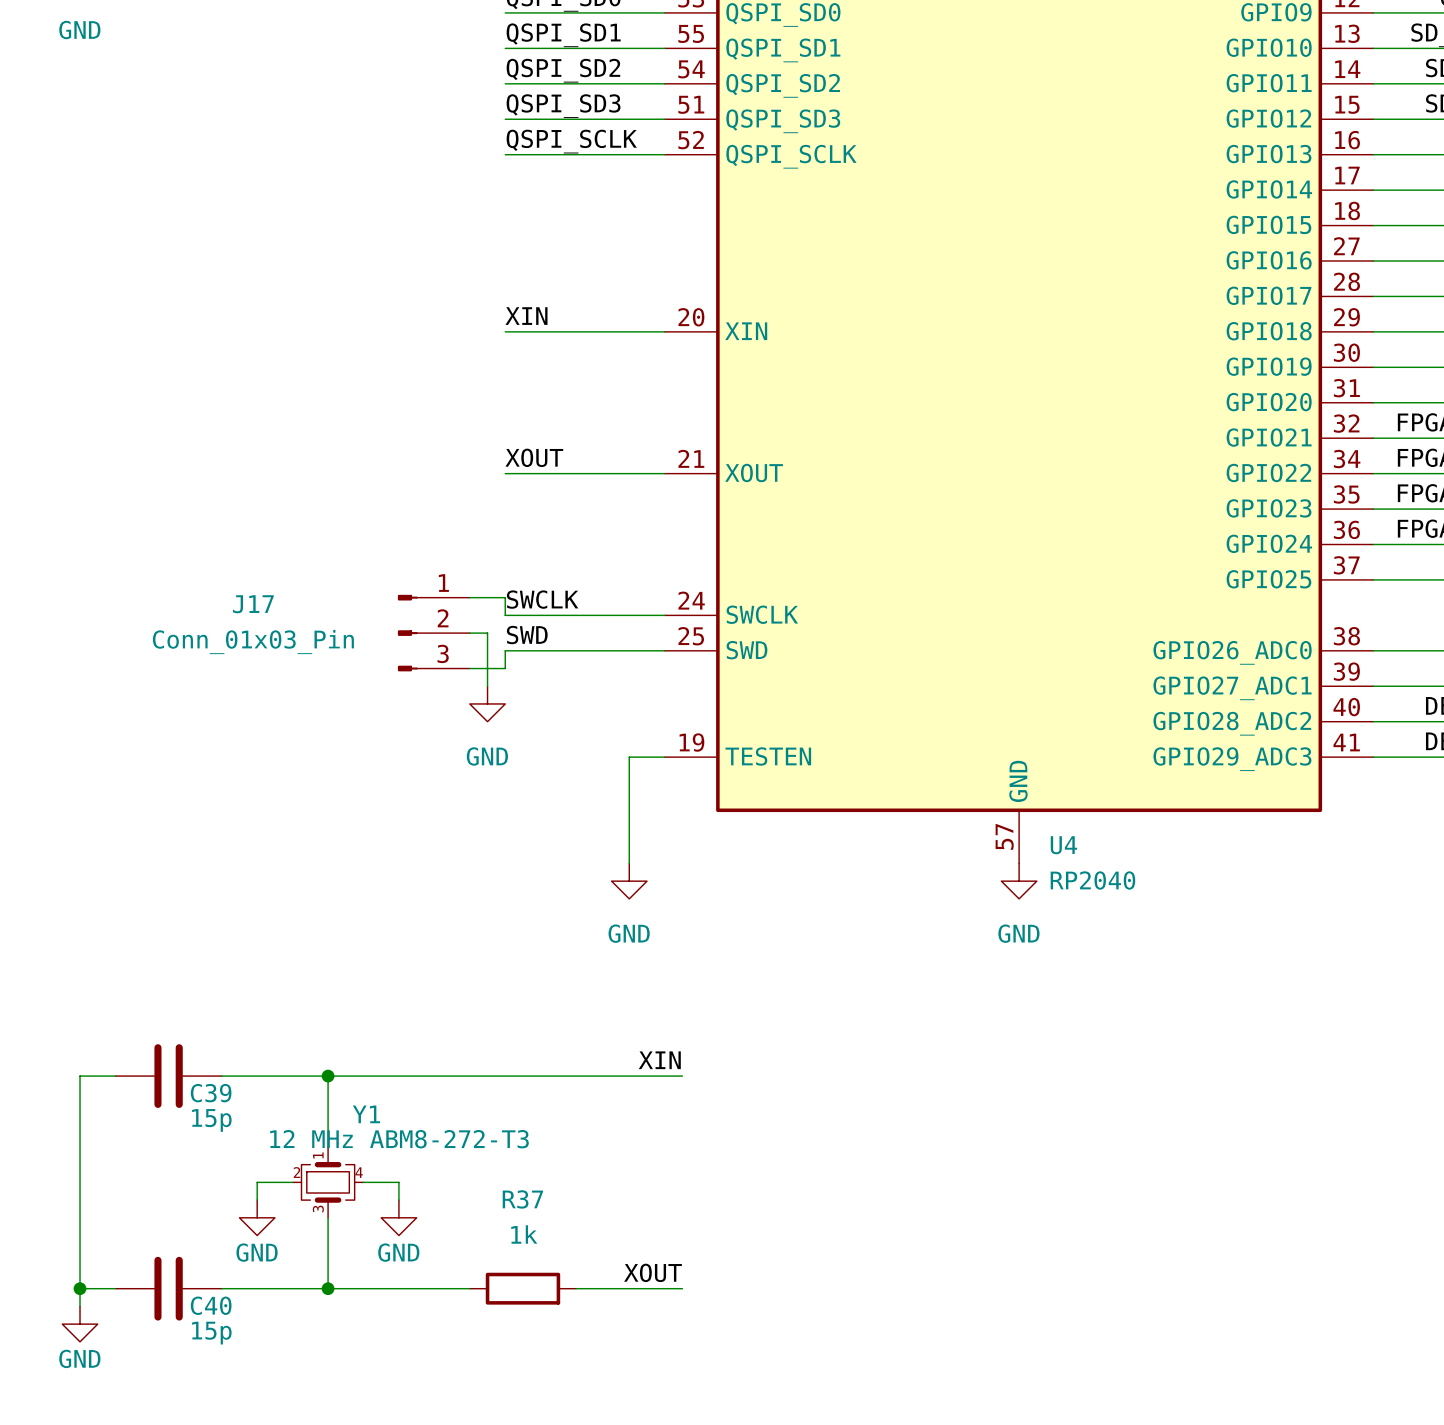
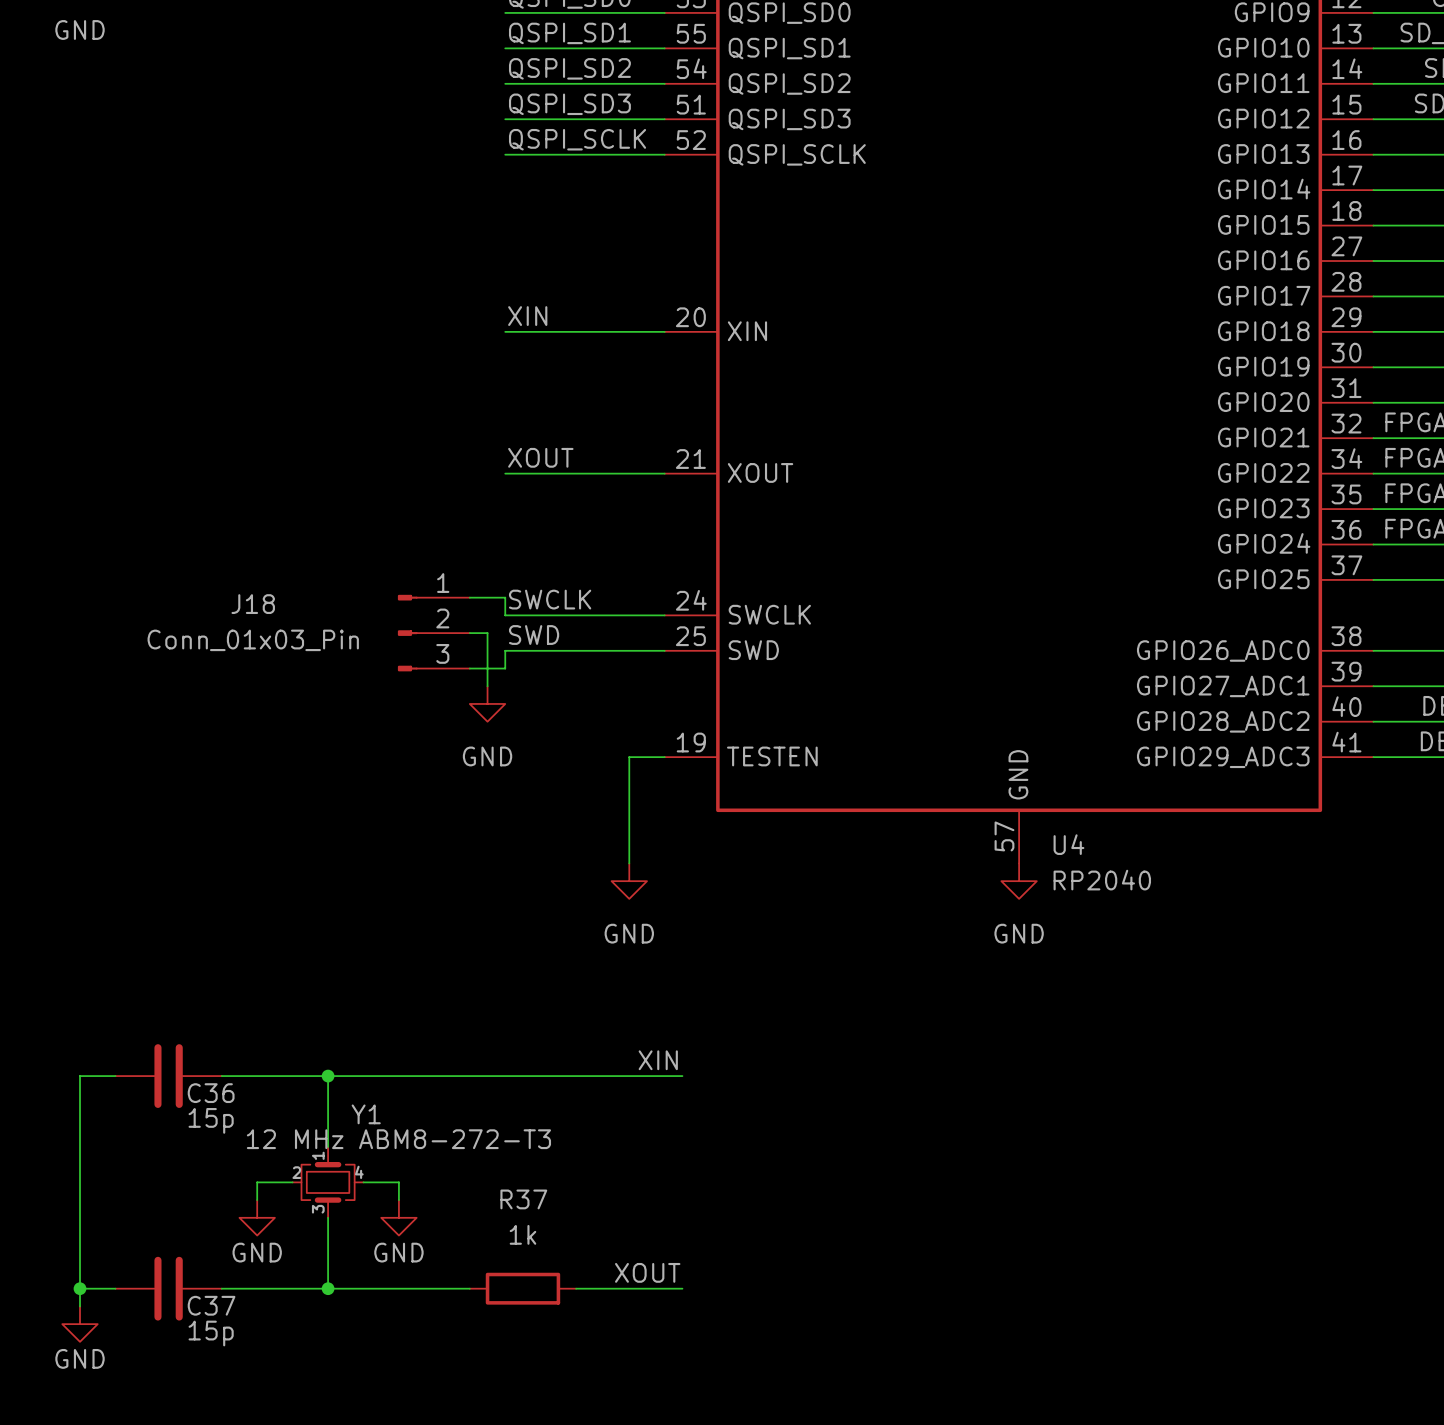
J17 name: J17 (253, 604) -> J18 (253, 604)
C39 name: C39 (211, 1093) -> C36 (211, 1093)
C40 name: C40 (211, 1305) -> C37 (211, 1305)

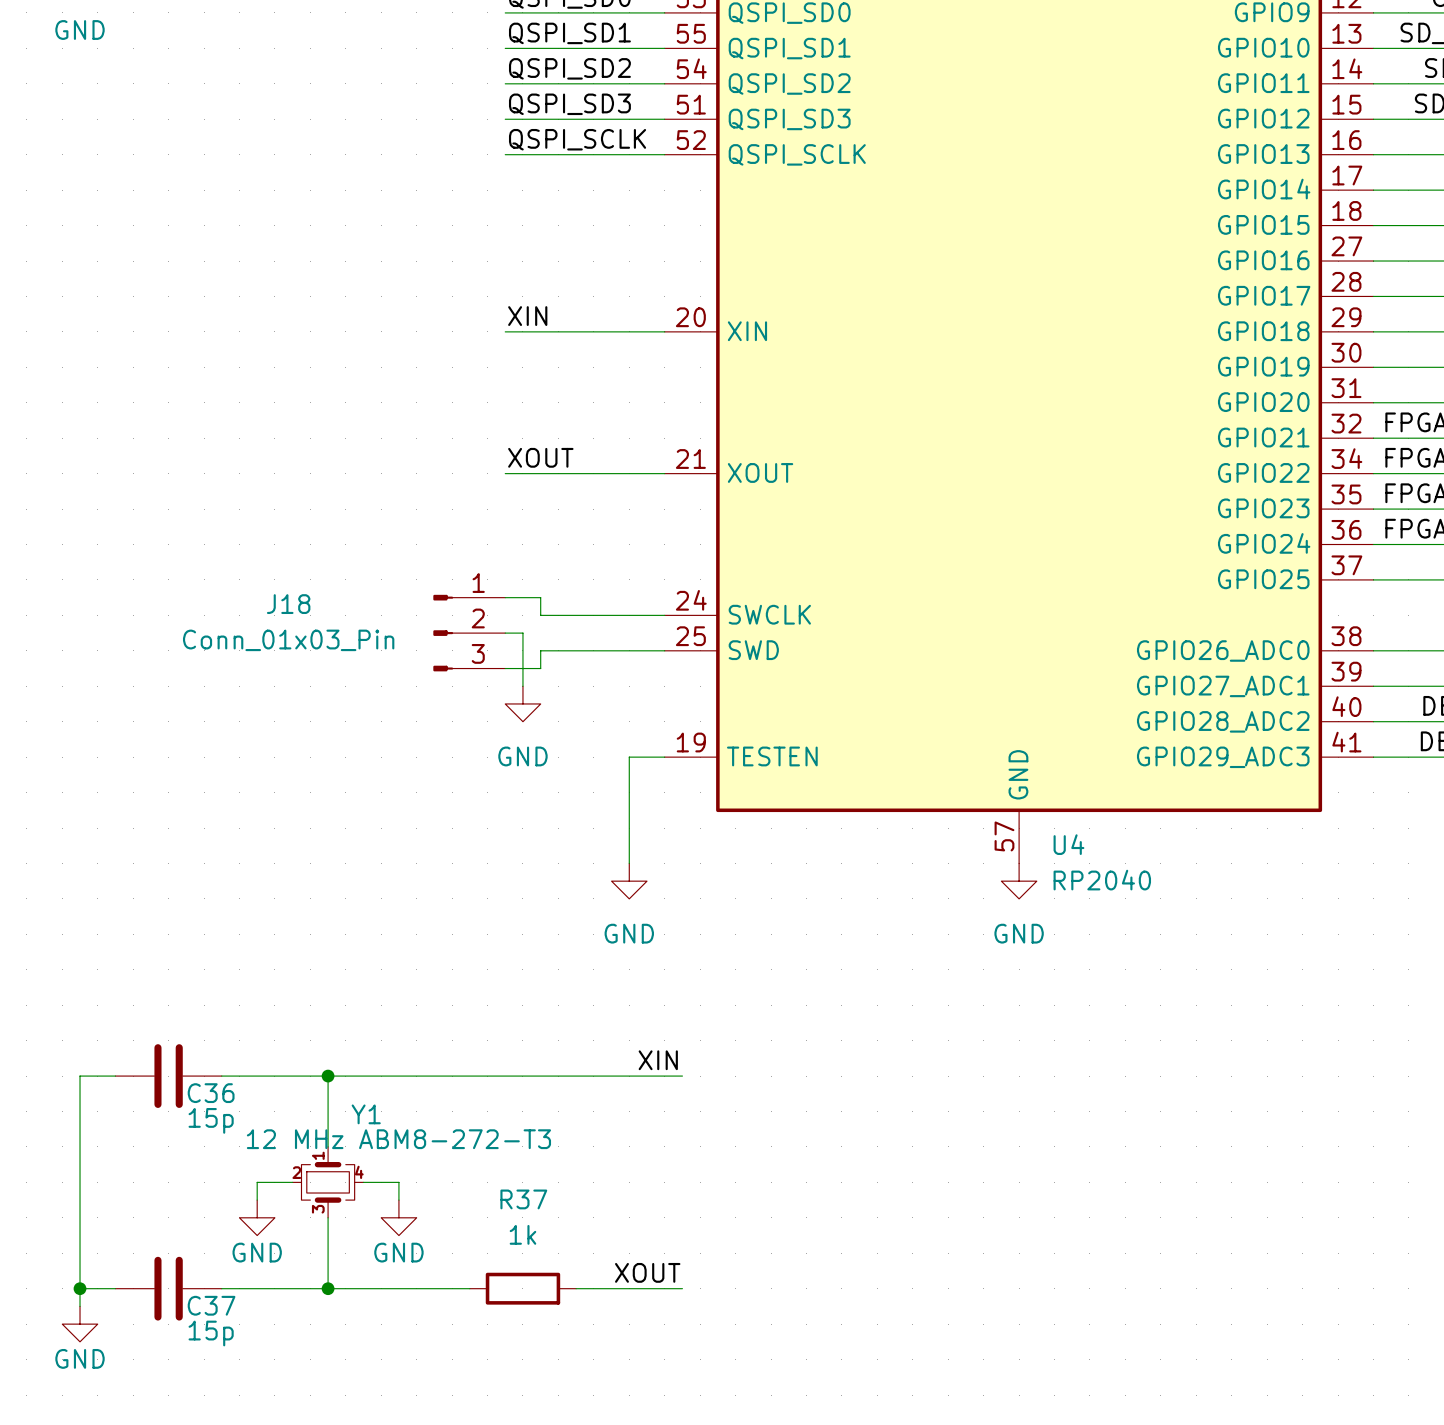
wire: (469, 597) (505, 597) (505, 615) (540, 615) -> (505, 597) (540, 597) (540, 615)
label: SWCLK (550, 599) -> none
J18 position: (433, 633) -> (469, 633)
wire: (469, 633) (487, 633) (487, 686) -> (505, 633) (522, 633) (522, 686)
label: SWD (534, 635) -> none
wire: (540, 650) (505, 650) (505, 668) (469, 668) -> (540, 650) (540, 668) (505, 668)
power symbol position: GND (487, 703) -> GND (522, 703)

